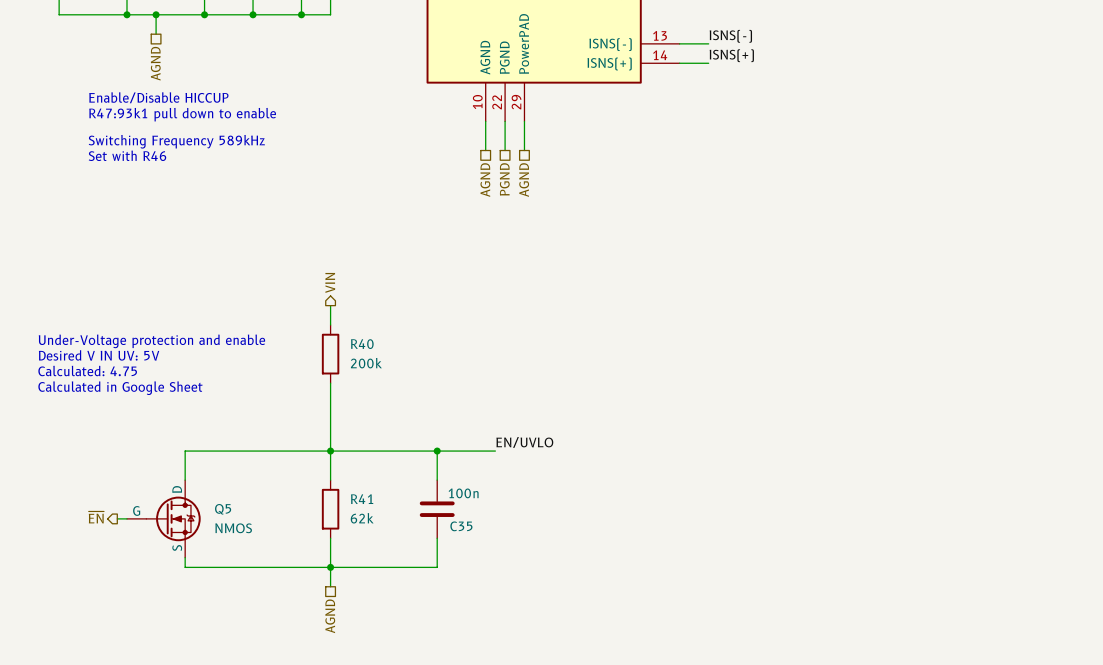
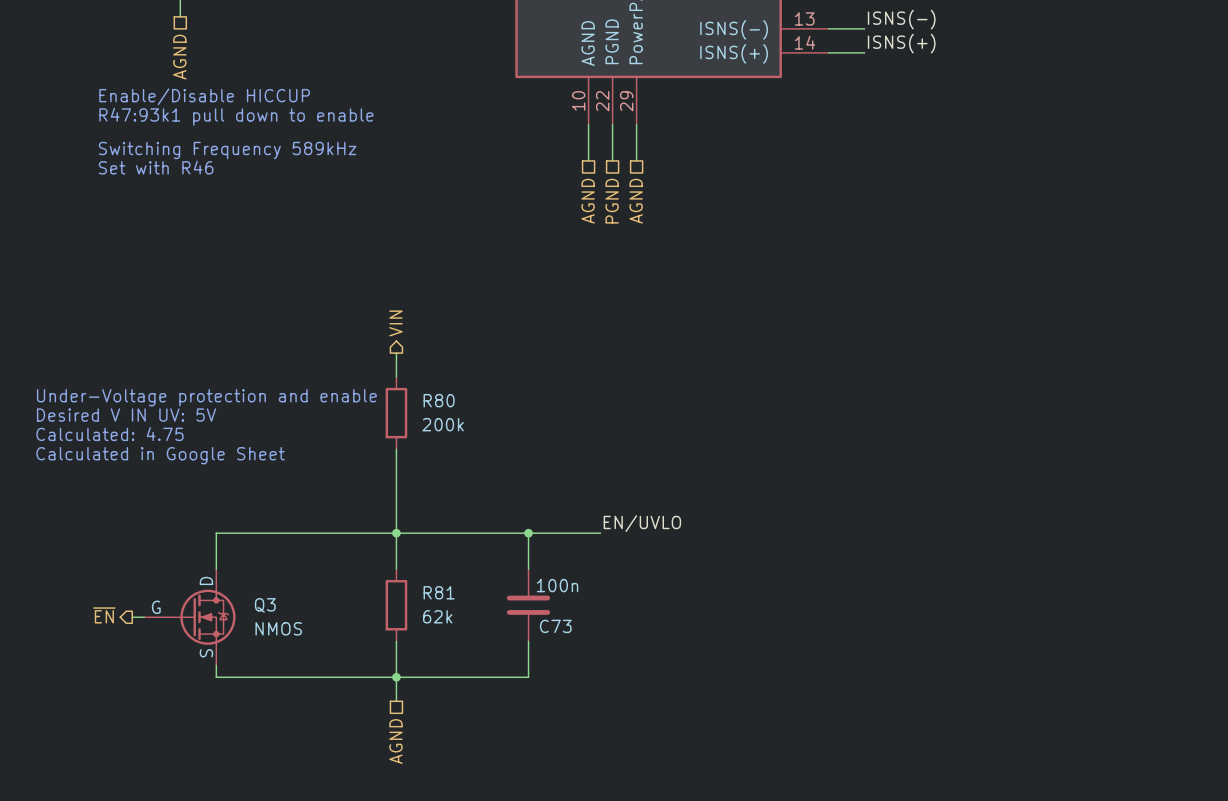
R40 name: R40 (362, 344) -> R80 (439, 400)
R41 name: R41 (362, 499) -> R81 (439, 592)
Q5 name: Q5 (223, 509) -> Q3 (265, 605)
C35 name: C35 (461, 526) -> C73 (555, 626)

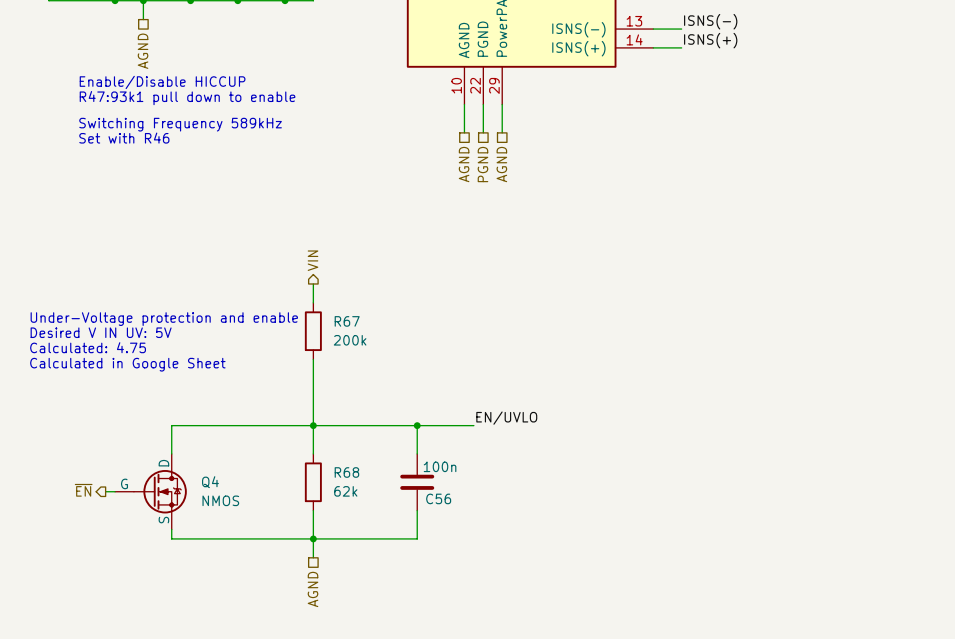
R80 name: R80 (439, 400) -> R67 (347, 321)
R81 name: R81 (439, 592) -> R68 (346, 472)
Q3 name: Q3 (265, 605) -> Q4 (210, 482)
C73 name: C73 (555, 626) -> C56 (438, 498)

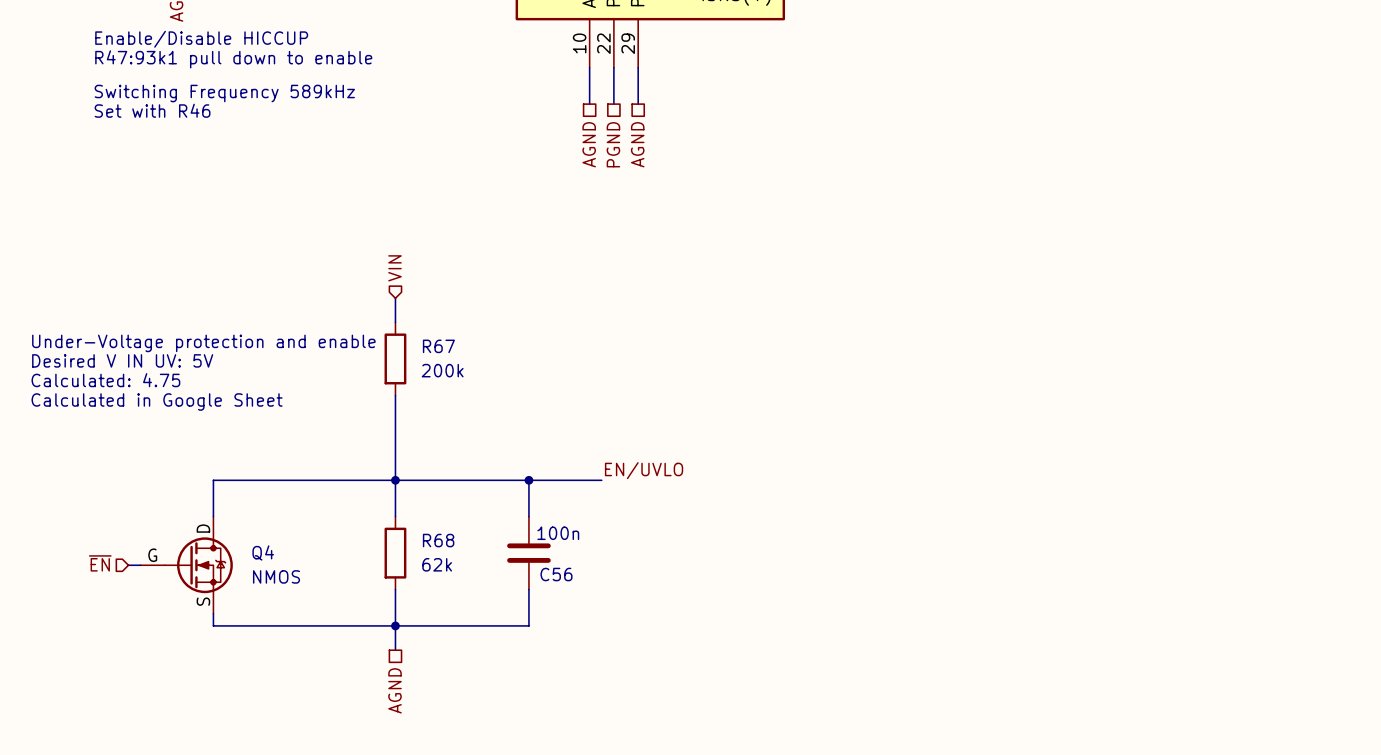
hierarchical label shape: output (313, 260) -> input (395, 268)
hierarchical label shape: output (83, 490) -> input (100, 563)

